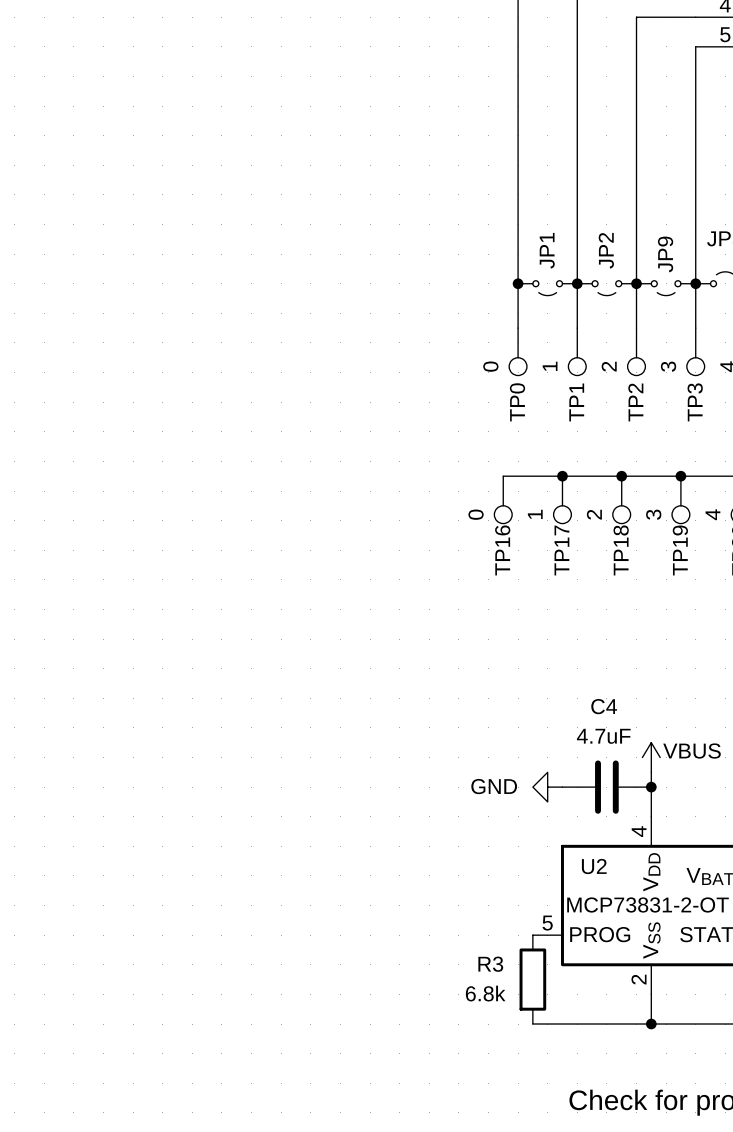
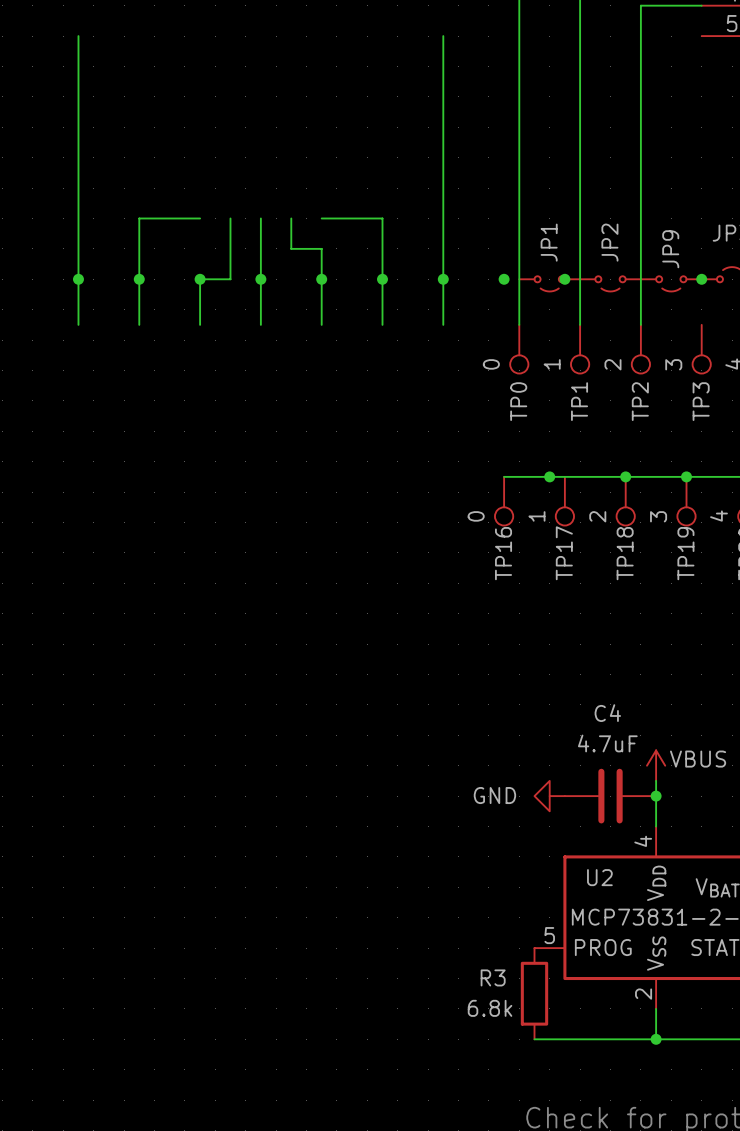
wire: none -> (78, 36) (78, 324)
wire: (695, 46) (695, 328) -> (443, 36) (443, 324)
wire: none -> (200, 218) (139, 218) (139, 324)
wire: none -> (230, 218) (230, 279) (200, 279) (200, 324)
wire: none -> (260, 218) (260, 324)
wire: none -> (291, 218) (291, 248) (321, 248) (321, 324)
wire: none -> (321, 218) (382, 218) (382, 324)
junction: none -> (78, 279)
junction: none -> (139, 279)
junction: none -> (200, 279)
junction: none -> (260, 279)
junction: none -> (321, 279)
junction: none -> (382, 279)
junction: none -> (443, 279)
junction position: (518, 283) -> (504, 279)
junction position: (577, 283) -> (564, 279)
junction: (636, 283) -> none
junction position: (562, 476) -> (549, 476)

